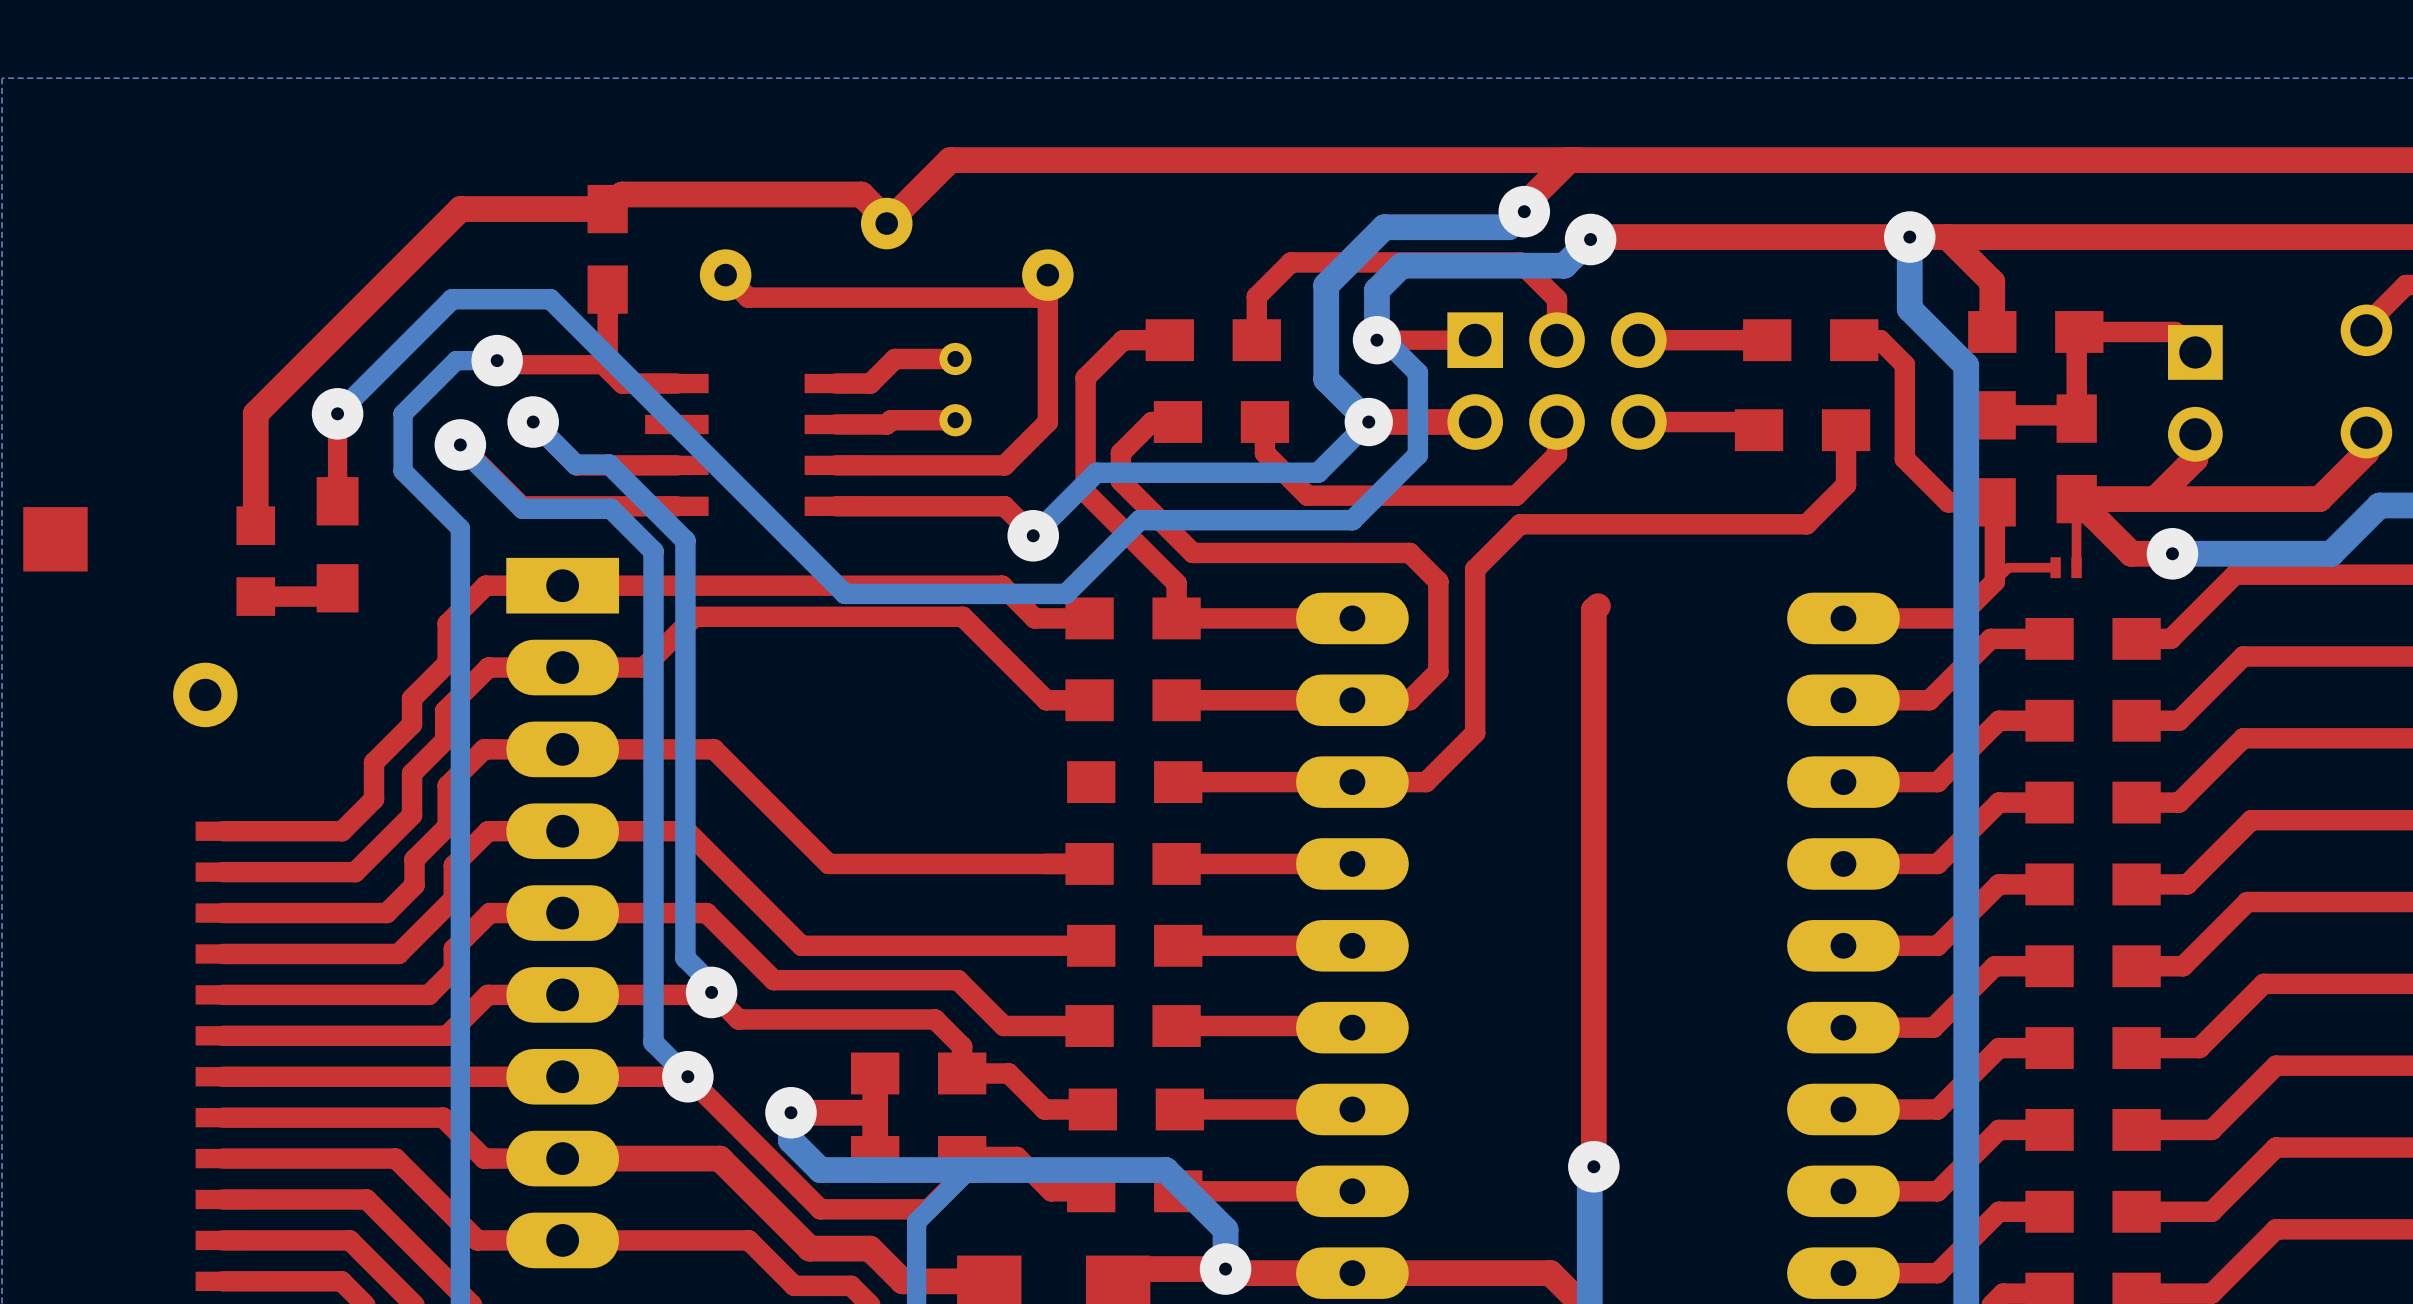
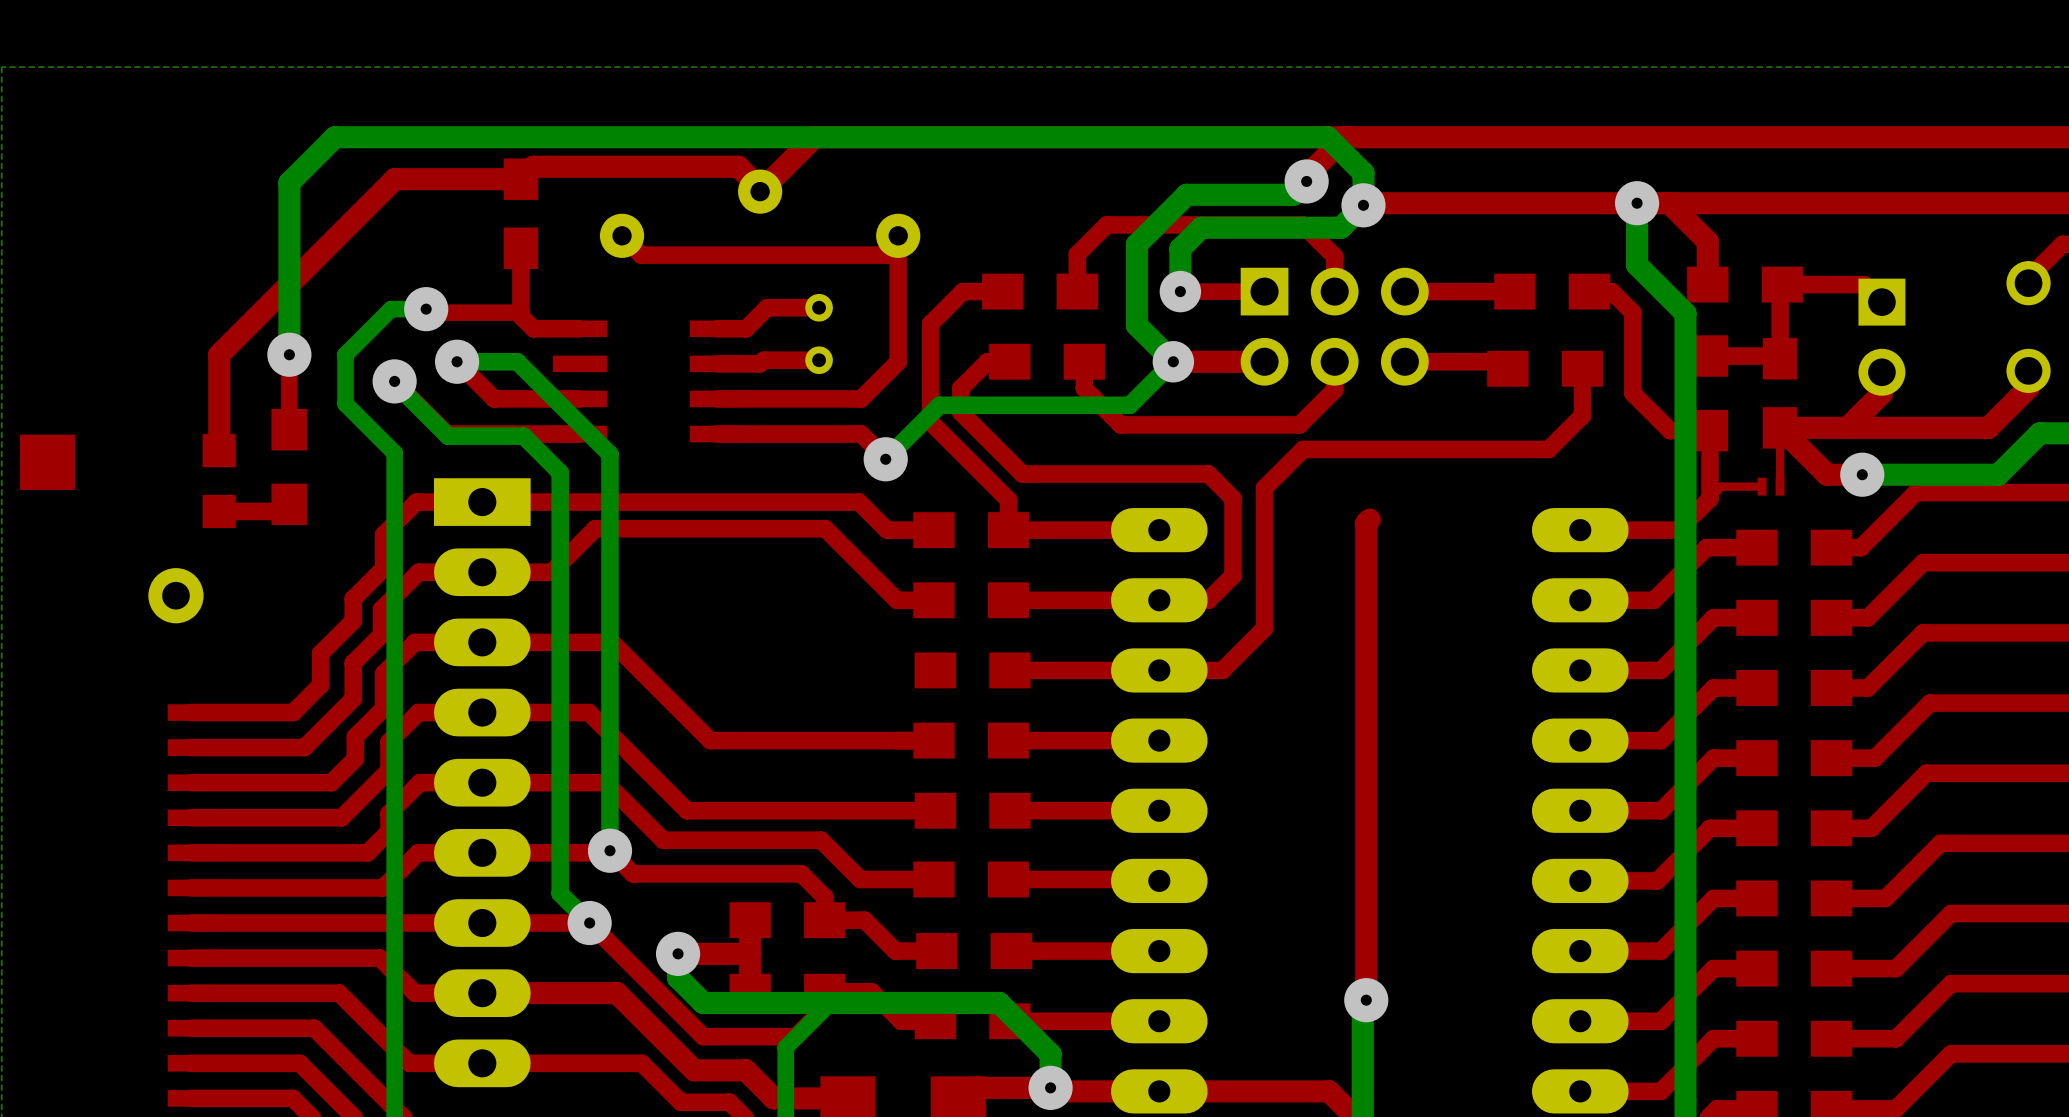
bottom track: (1385, 340) (1417, 372) (1417, 454) (1352, 520) (1139, 520) (1065, 593) (845, 593) (550, 299) (452, 299) (337, 413) -> (1363, 205) (1363, 173) (1327, 137) (334, 137) (289, 182) (289, 354)
bottom track: (533, 422) (575, 464) (609, 464) (685, 540) (685, 958) (711, 984) -> (457, 361) (517, 361) (610, 454) (610, 843)

